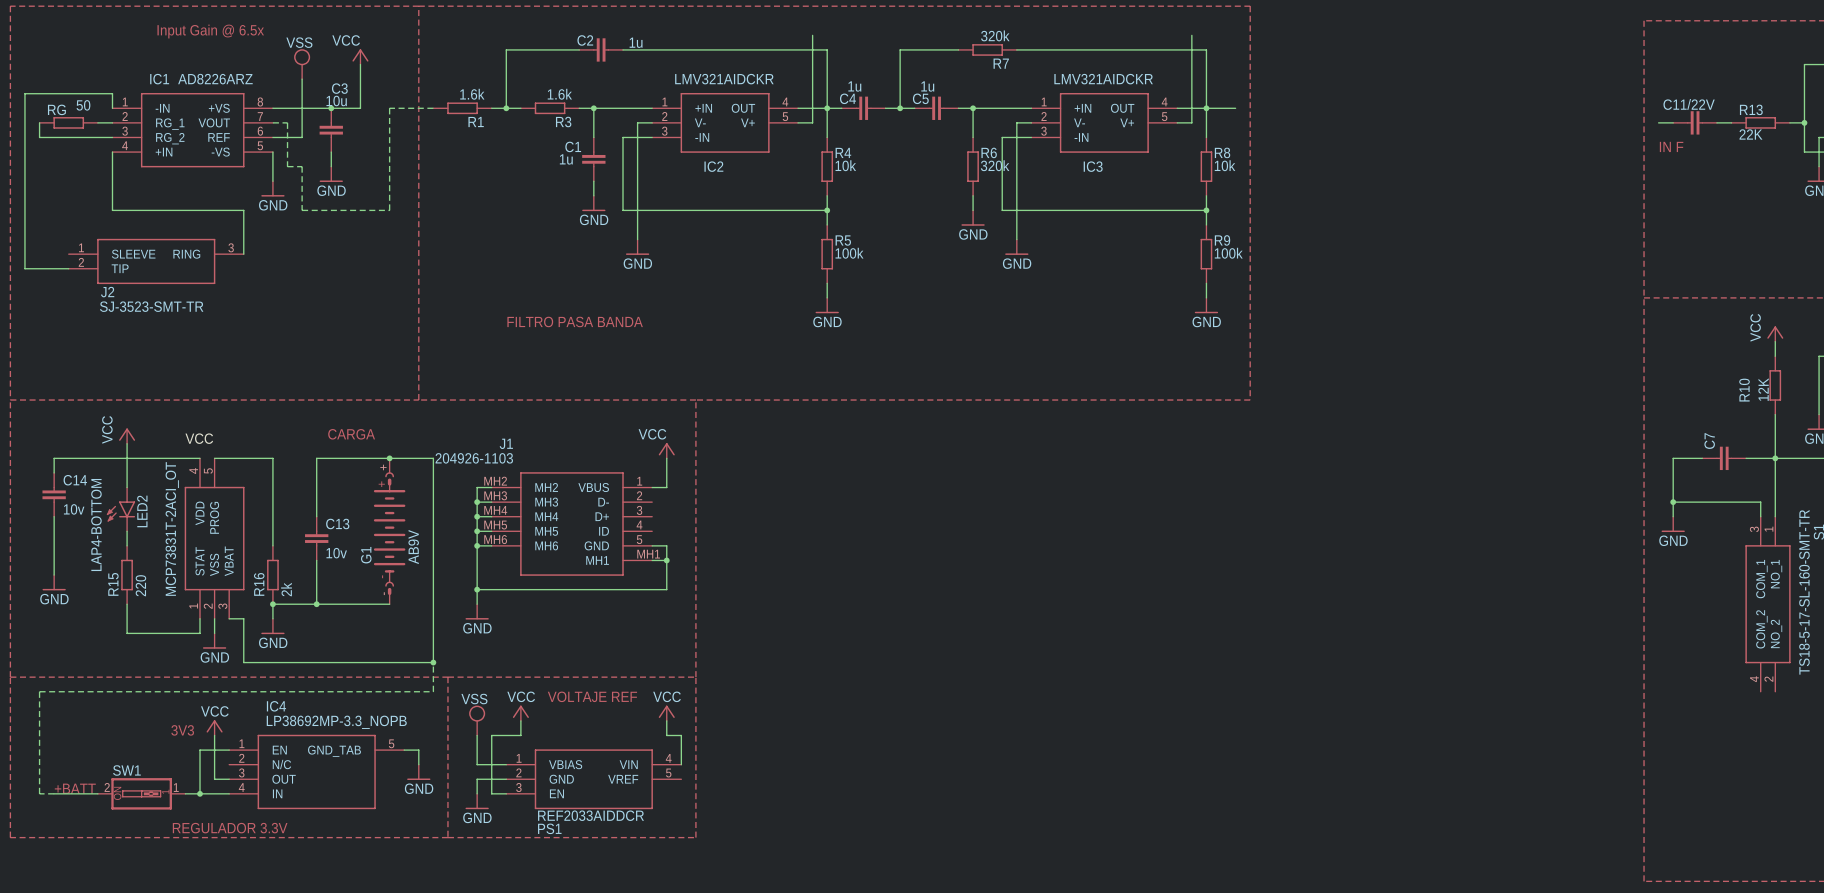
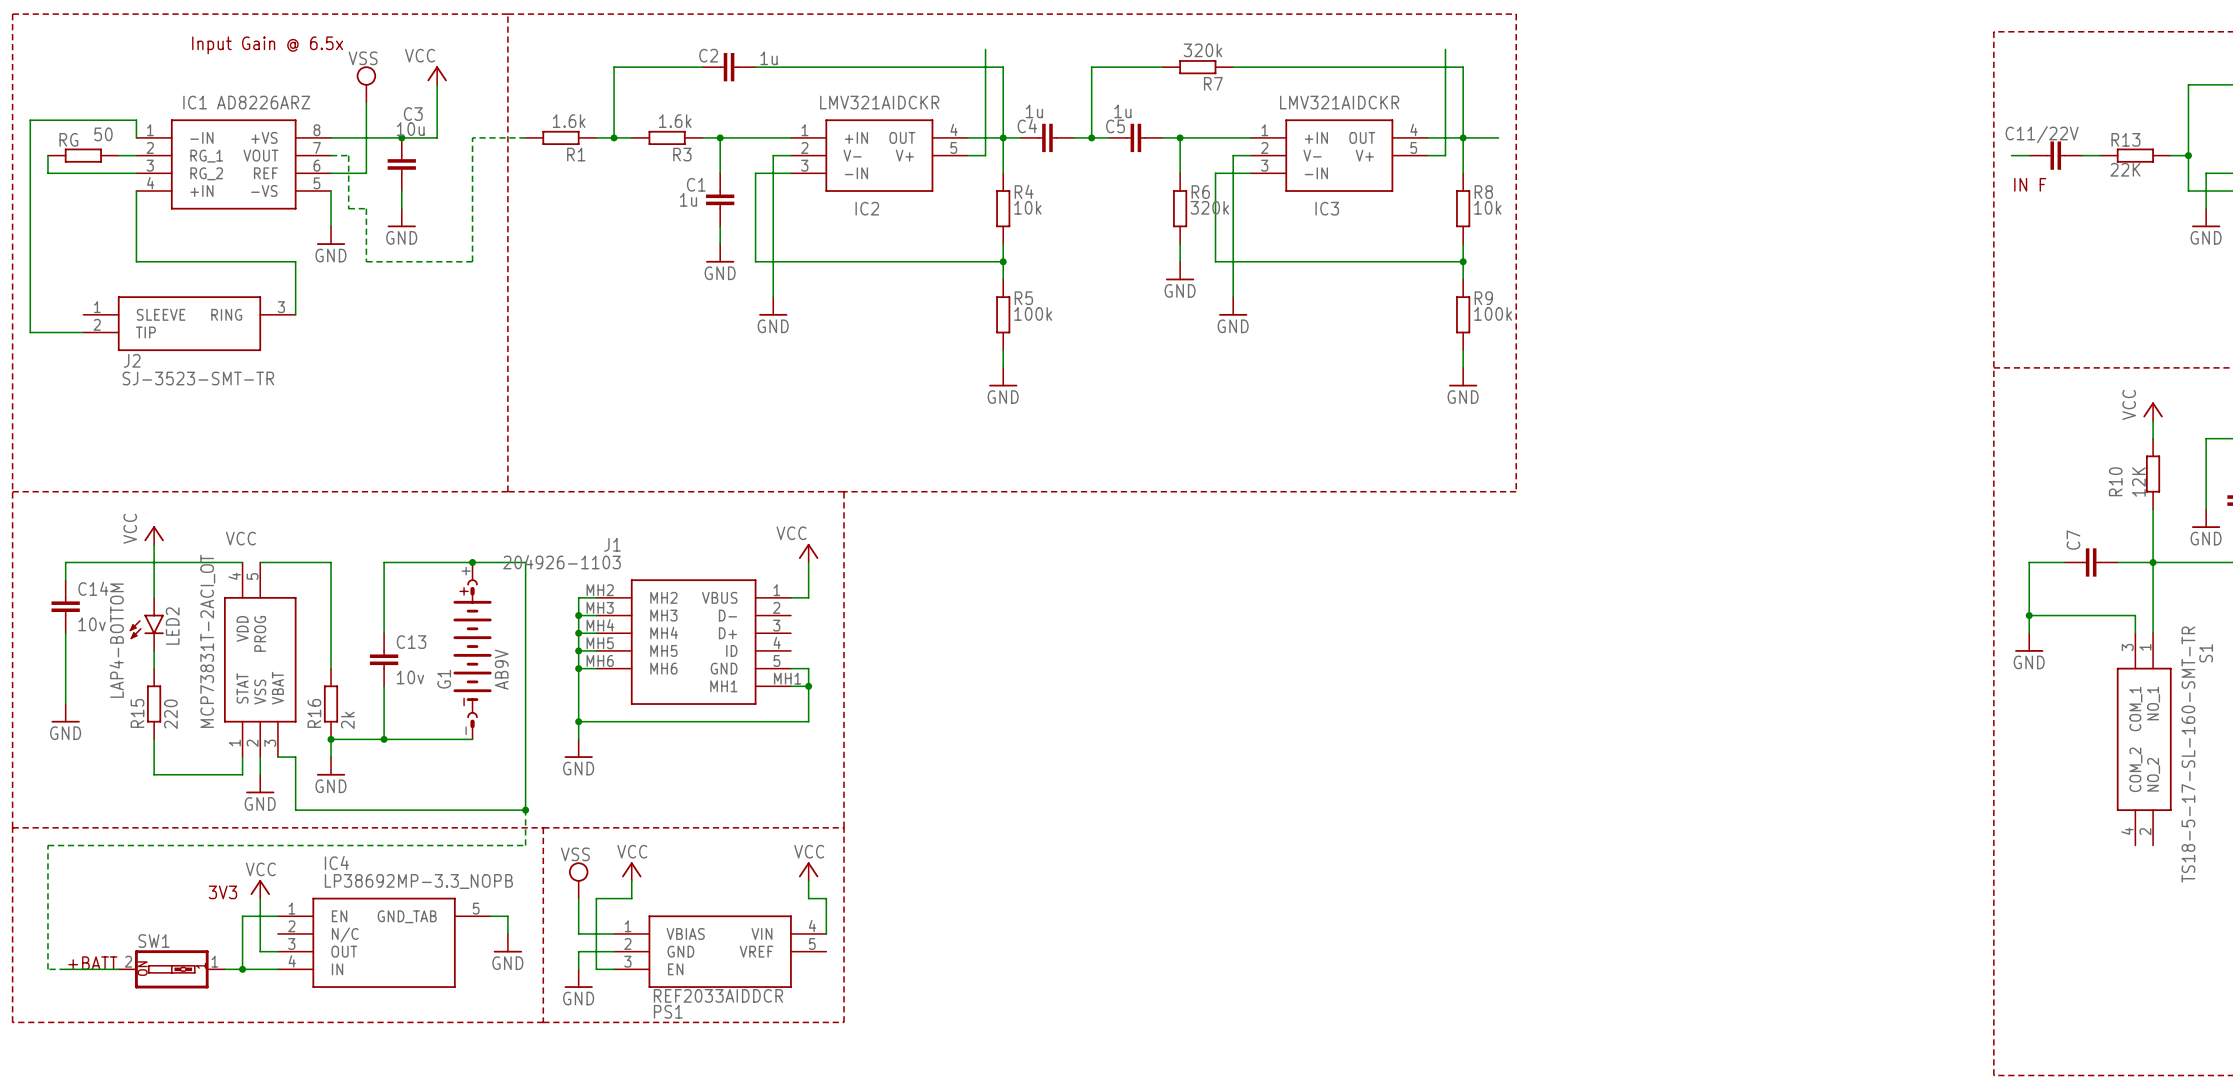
text: FILTRO PASA BANDA (575, 321) -> none
text: CARGA (351, 434) -> none
text: VOLTAJE REF (592, 696) -> none
text: REGULADOR 3.3V (230, 828) -> none

